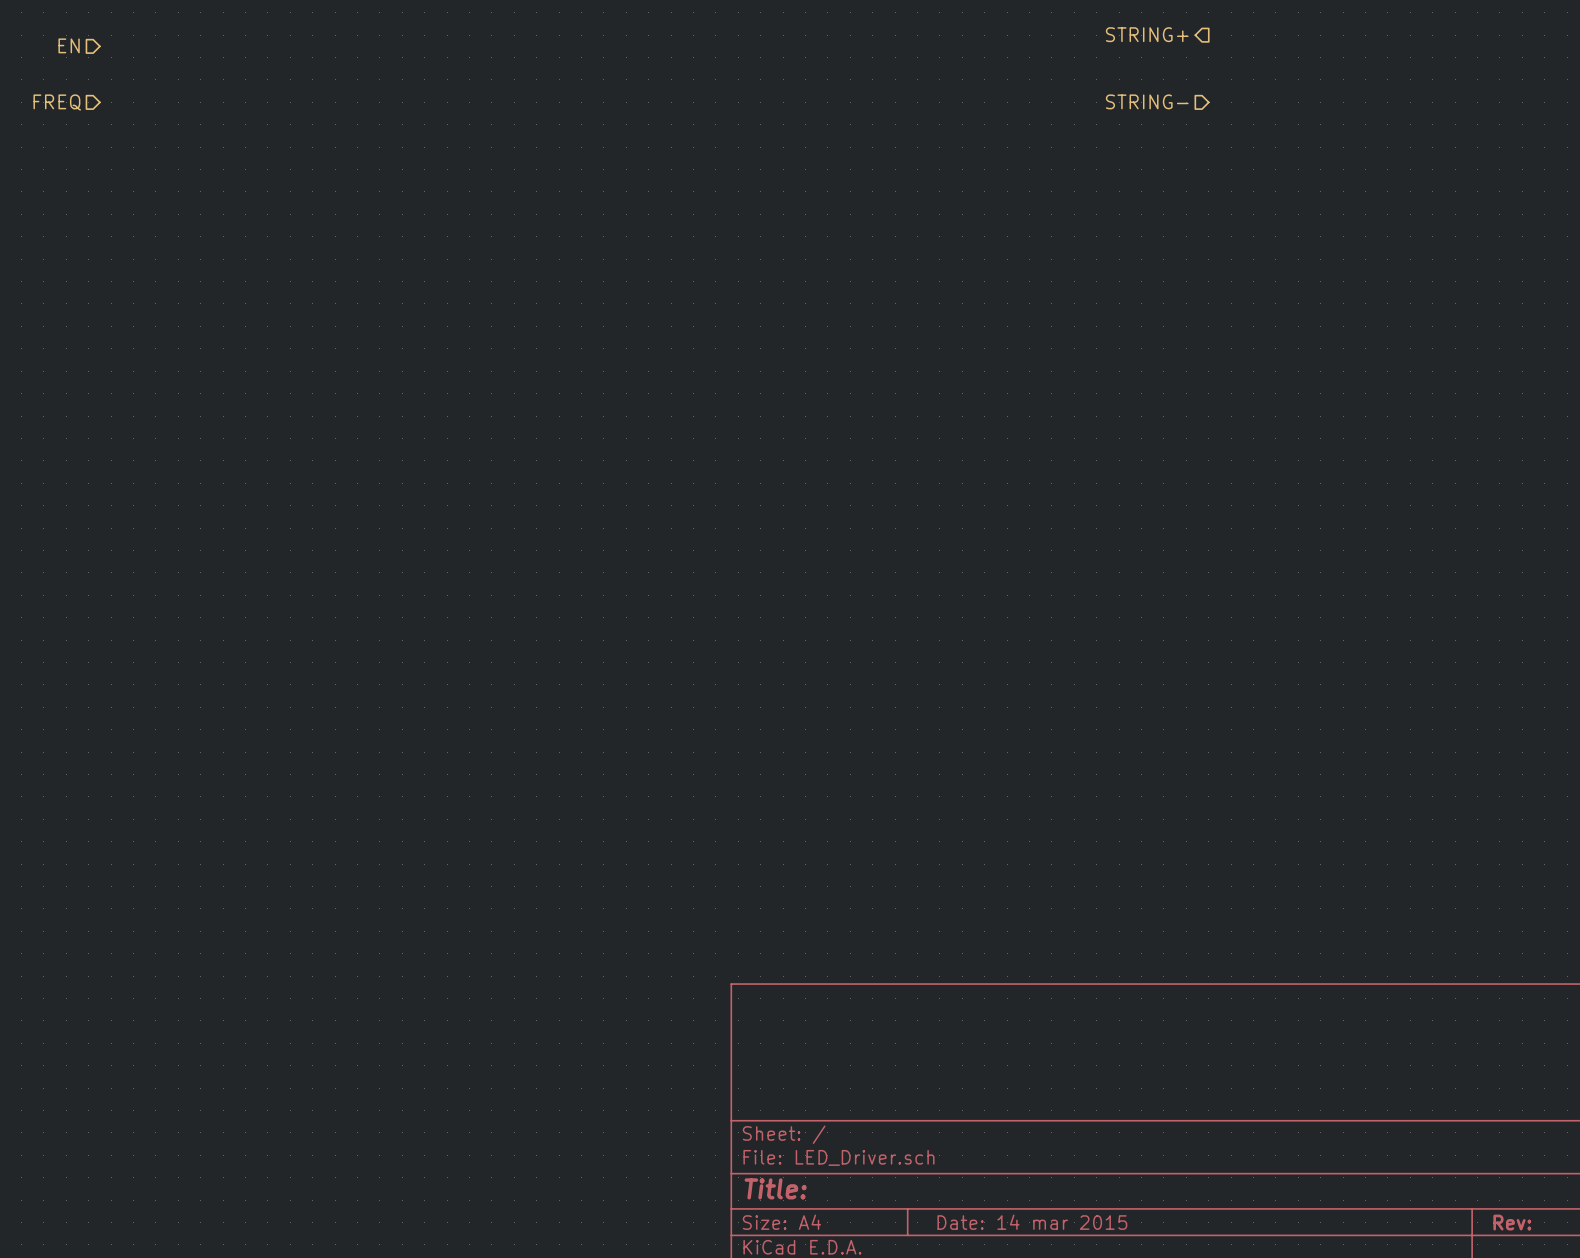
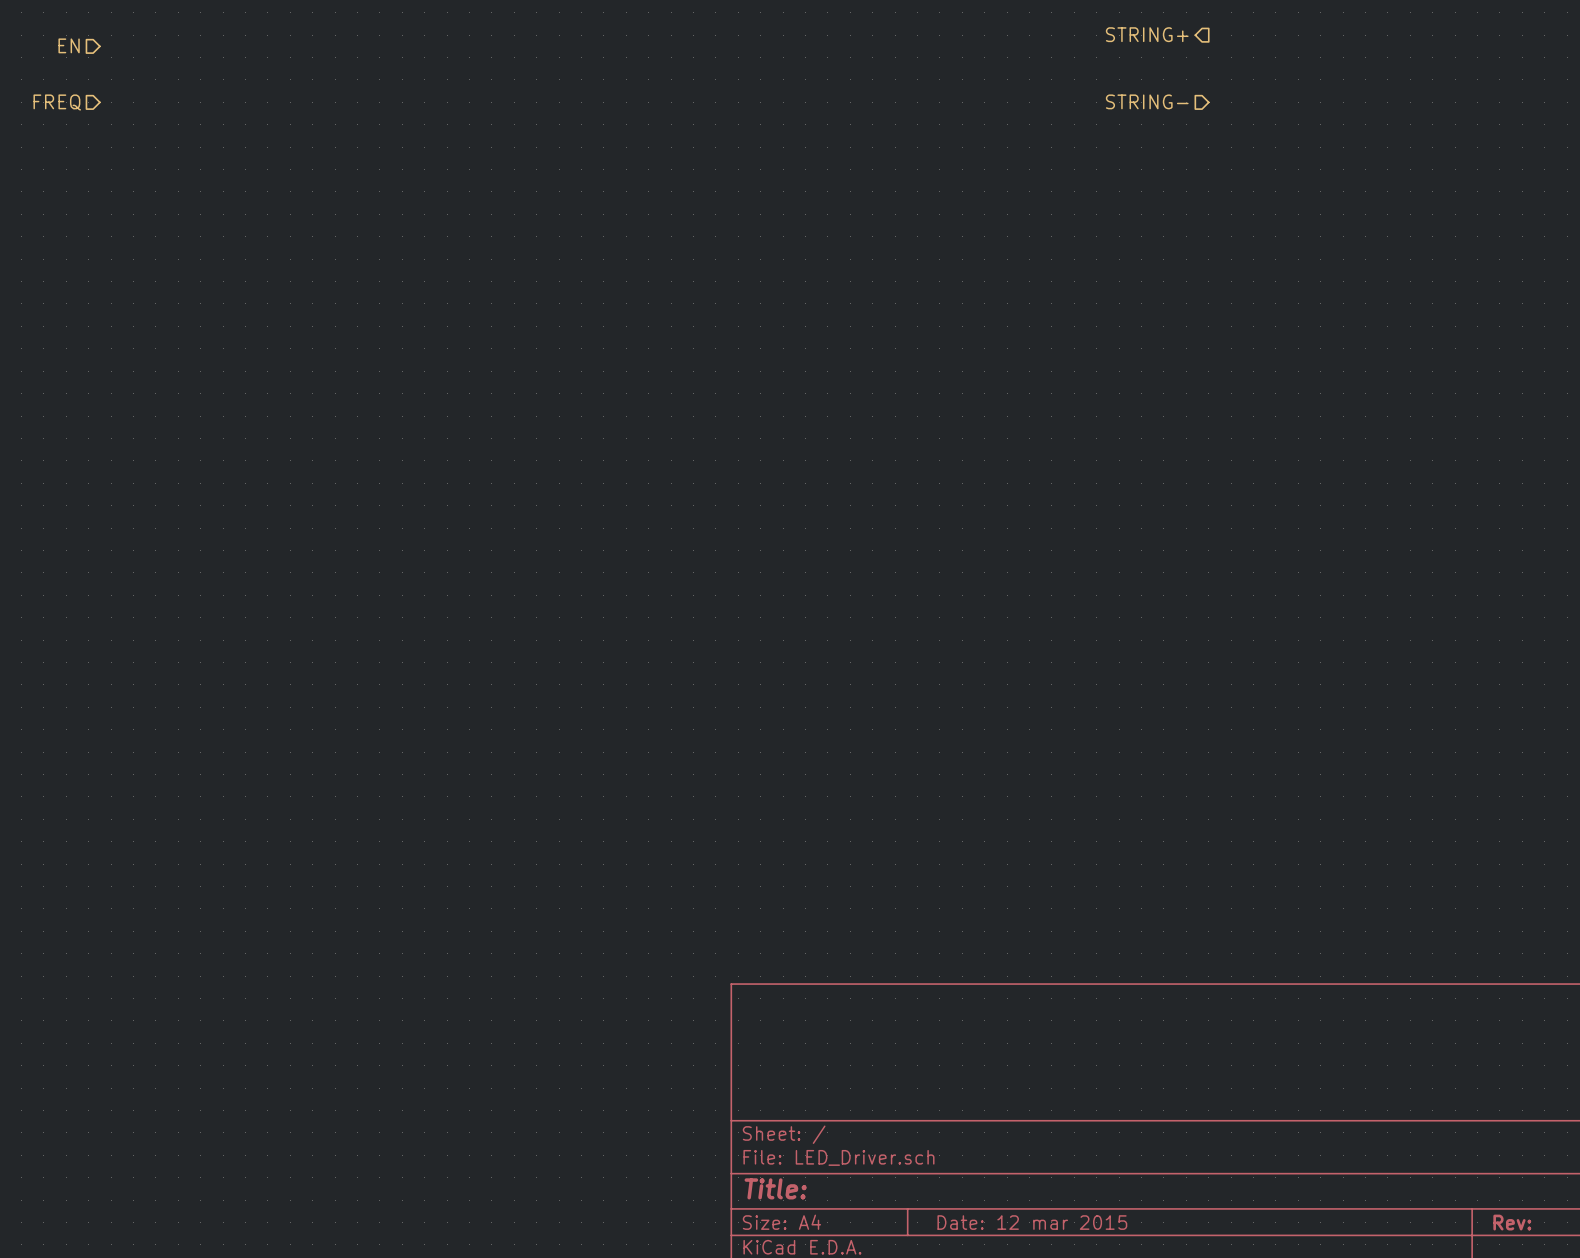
title block: Date: 14 mar 2015 (1032, 1222) -> Date: 12 mar 2015 (1032, 1222)

